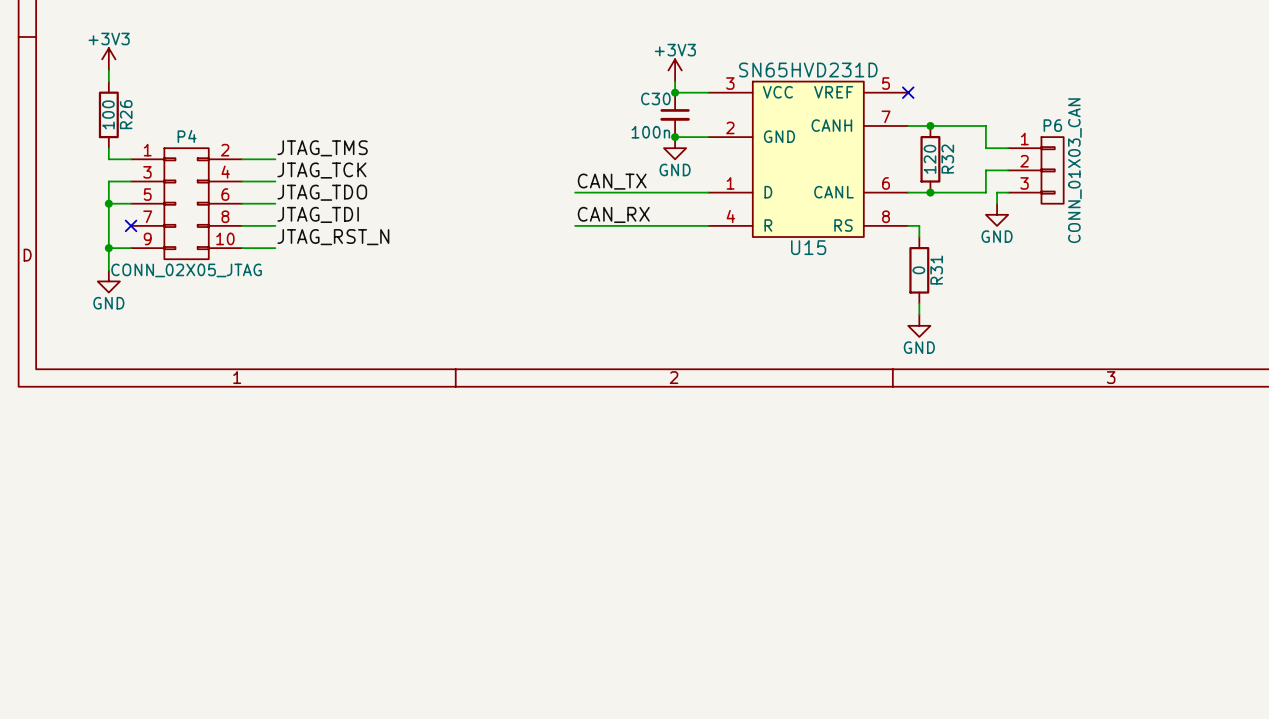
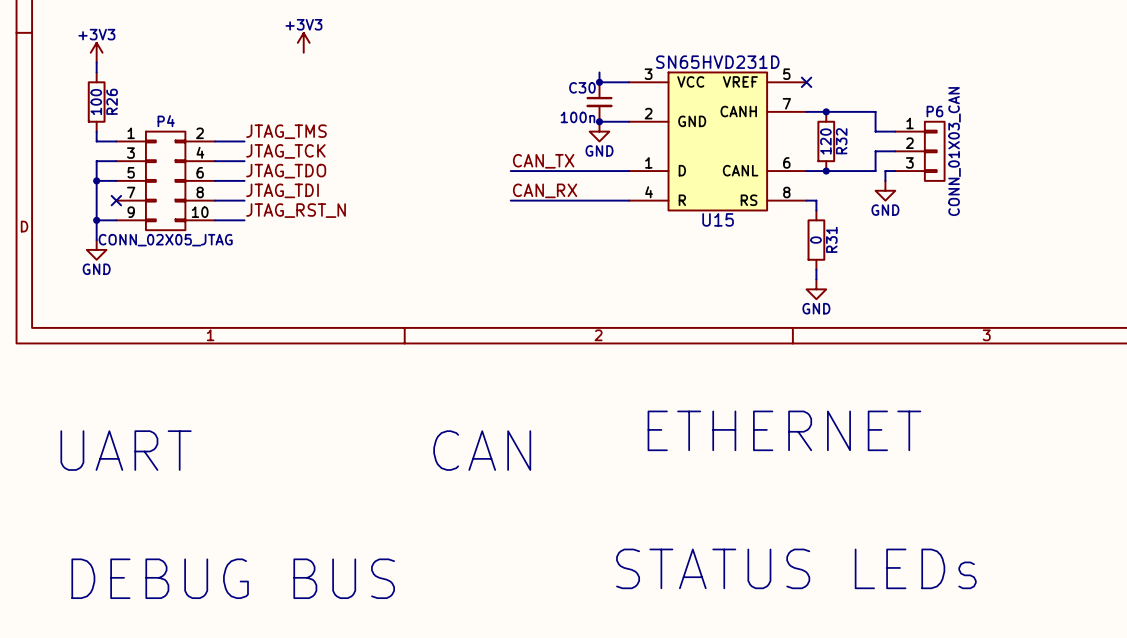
power symbol: none -> +3V3 (303, 42)
power symbol: +3V3 (675, 70) -> none
text: none -> ETHERNET (784, 430)
text: none -> UART (126, 450)
text: none -> CAN (482, 450)
text: none -> STATUS LEDs (796, 568)
text: none -> DEBUG BUS (233, 578)

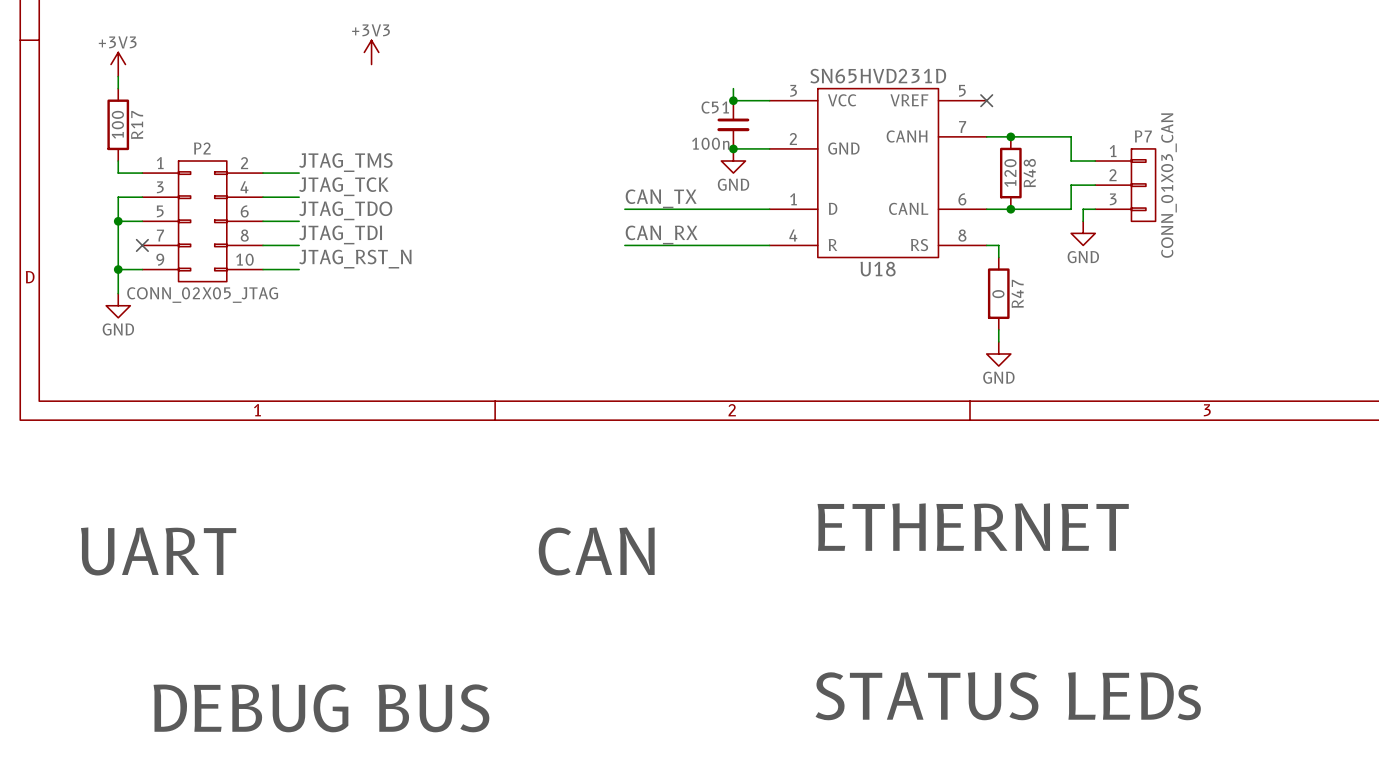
C30 name: C30 (582, 87) -> C51 (715, 107)
R26 name: R26 (112, 101) -> R17 (137, 124)
P6 name: P6 (934, 111) -> P7 (1143, 136)
P4 name: P4 (166, 121) -> P2 (202, 148)
R32 name: R32 (841, 141) -> R48 (1029, 173)
U15 name: U15 (718, 219) -> U18 (878, 269)
R31 name: R31 (831, 239) -> R47 (1017, 293)

